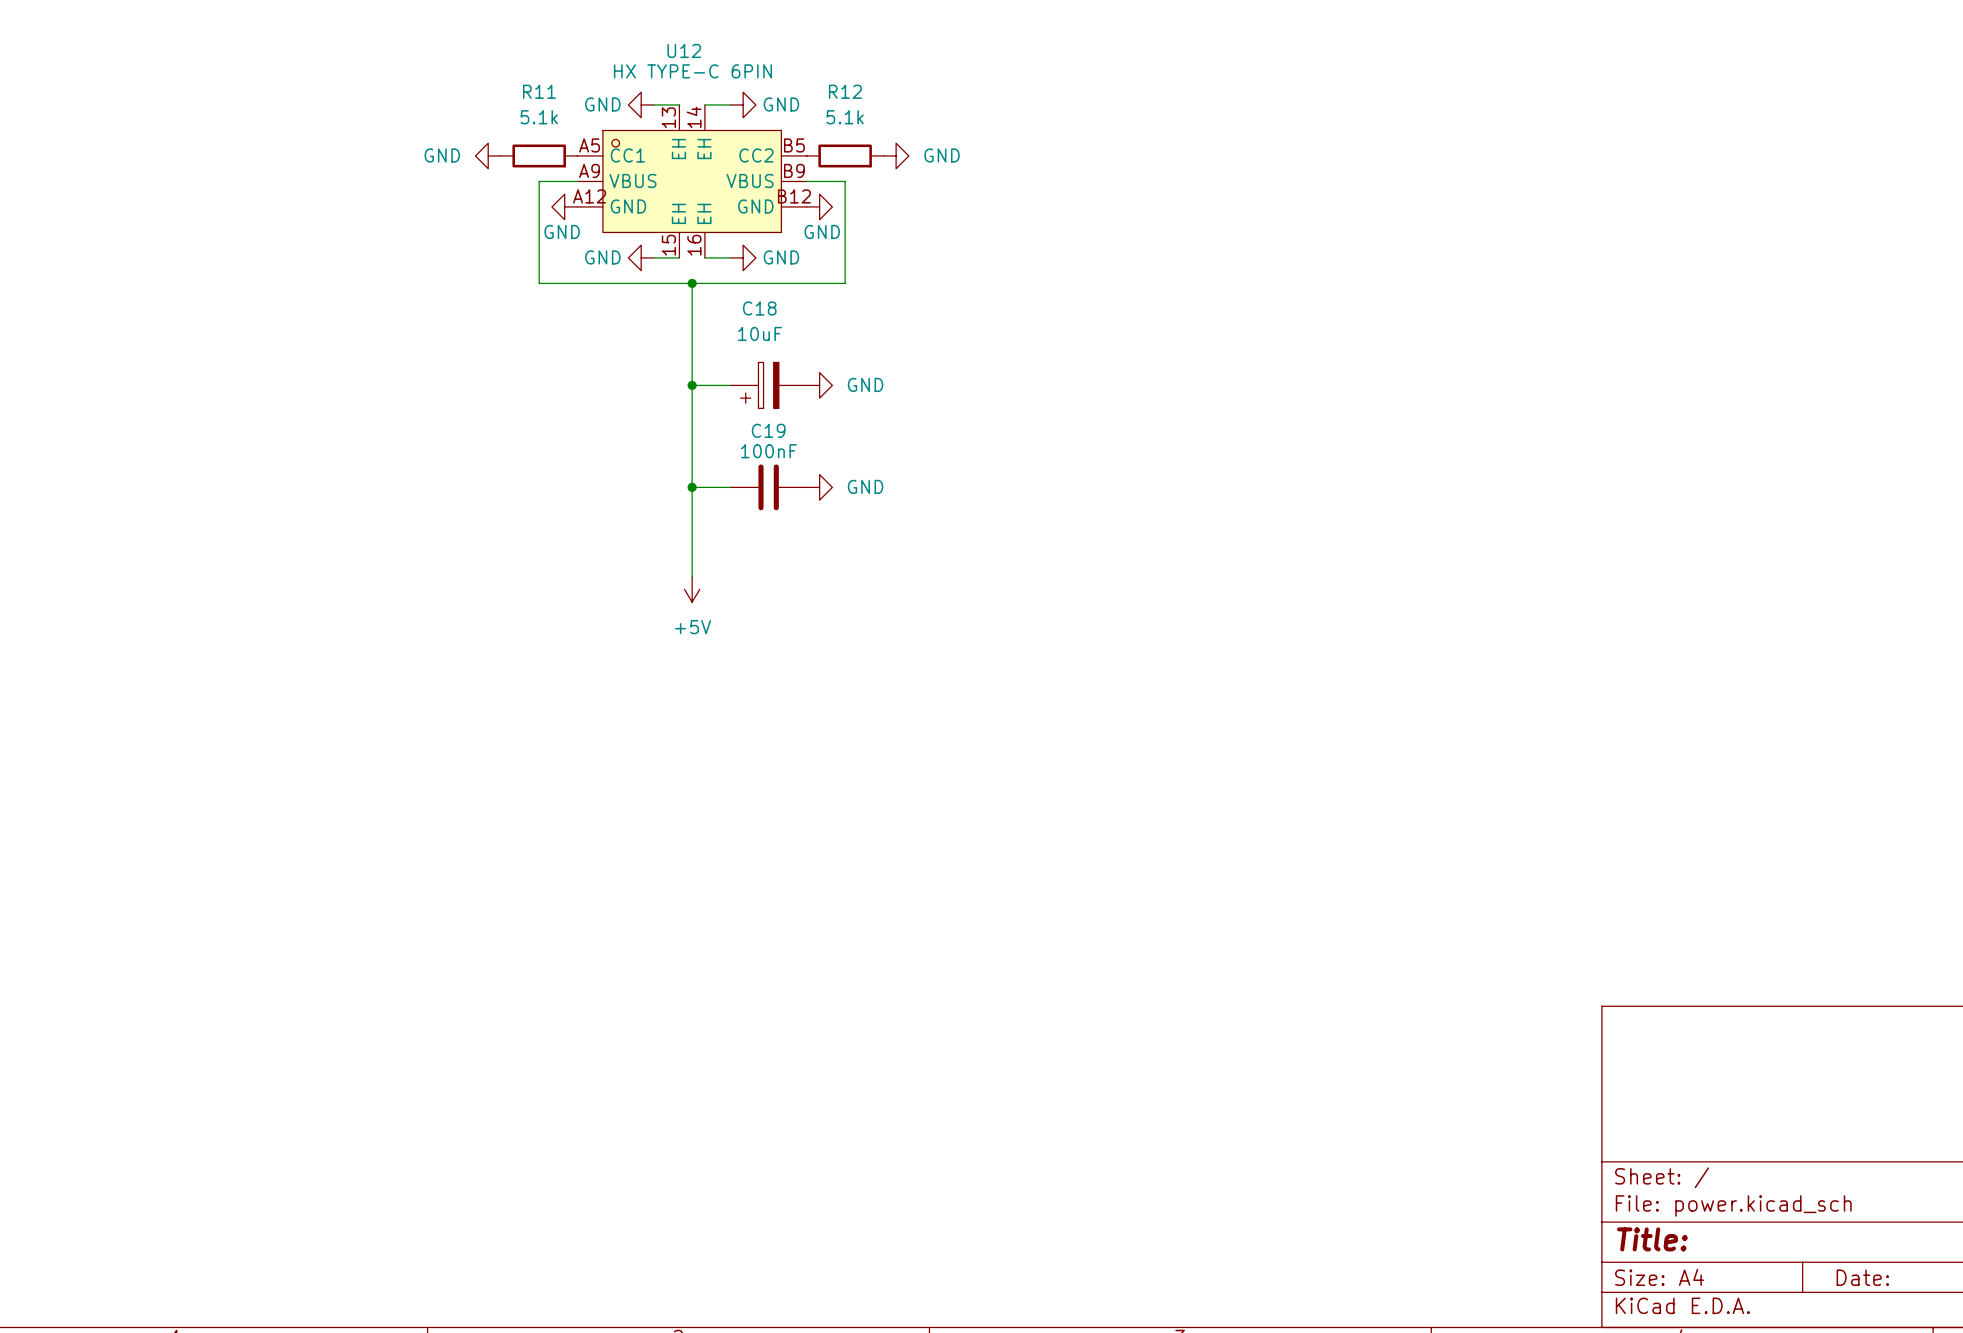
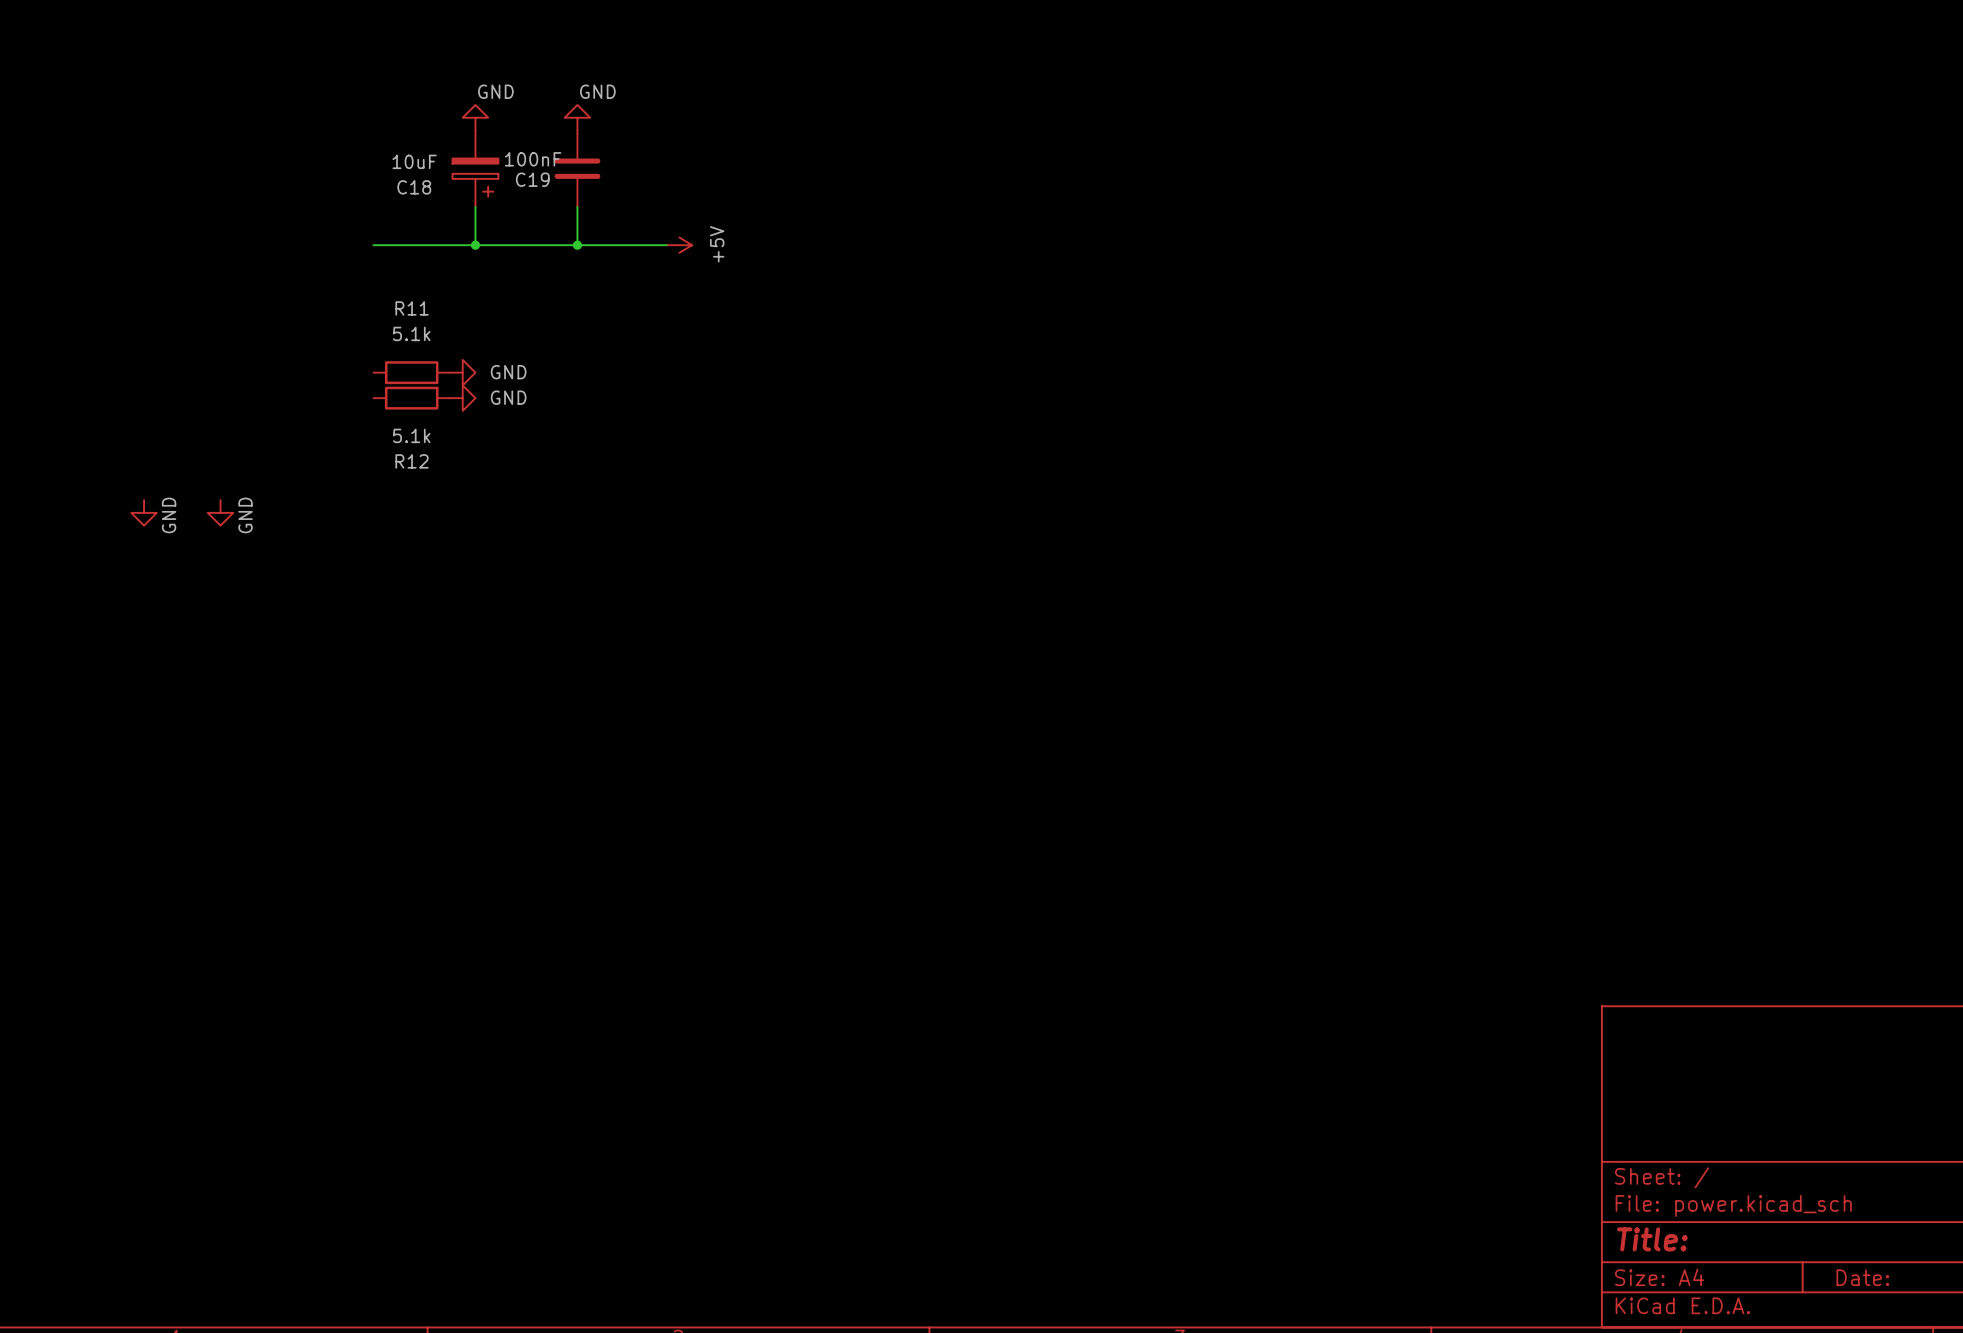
R12 name position: R12 (845, 91) -> R12 (412, 461)
power symbol: GND (641, 104) -> none
wire: (653, 104) (679, 104) -> none
wire: (704, 104) (730, 104) -> none
power symbol: GND (743, 104) -> none
power symbol: none -> GND (577, 117)
R12 value position: 5.1k (845, 117) -> 5.1k (411, 435)
power symbol text position: GND (442, 155) -> GND (495, 91)
power symbol rotation: 0° (488, 155) -> 90° clockwise (475, 117)
power symbol position: GND (488, 155) -> GND (475, 117)
R11 position: (539, 155) -> (411, 372)
R12 position: (845, 155) -> (411, 398)
power symbol: GND (896, 155) -> none
wire: (577, 181) (539, 181) (539, 283) (845, 283) (845, 181) (806, 181) -> none
U12: HX TYPE-C 6PIN (692, 181) -> none
wire: none -> (475, 206) (475, 245)
power symbol: GND (564, 206) -> none
wire: none -> (577, 206) (577, 245)
power symbol: GND (819, 206) -> none
wire: none -> (373, 245) (666, 245)
junction: none -> (475, 245)
junction: none -> (577, 245)
power symbol: none -> +5V (679, 245)
power symbol: GND (641, 257) -> none
wire: (653, 257) (679, 257) -> none
wire: (704, 257) (730, 257) -> none
power symbol: GND (743, 257) -> none
wire: (692, 283) (692, 576) -> none
junction: (692, 283) -> none
power symbol: none -> GND (462, 372)
wire: (692, 385) (730, 385) -> none
junction: (692, 385) -> none
C18 rotation: 0° (759, 385) -> 90° counterclockwise (475, 177)
C18 position: (768, 385) -> (475, 168)
power symbol: GND (819, 385) -> none
power symbol: none -> GND (462, 398)
C19 name position: C19 (768, 430) -> C19 (532, 179)
C19 value position: 100nF (768, 451) -> 100nF (533, 159)
wire: (692, 487) (730, 487) -> none
junction: (692, 487) -> none
C19 rotation: 0° (768, 487) -> 90° clockwise (577, 168)
C19 position: (768, 487) -> (577, 168)
power symbol: GND (819, 487) -> none
power symbol: none -> GND (144, 512)
power symbol: none -> GND (220, 512)
power symbol: +5V (692, 589) -> none

